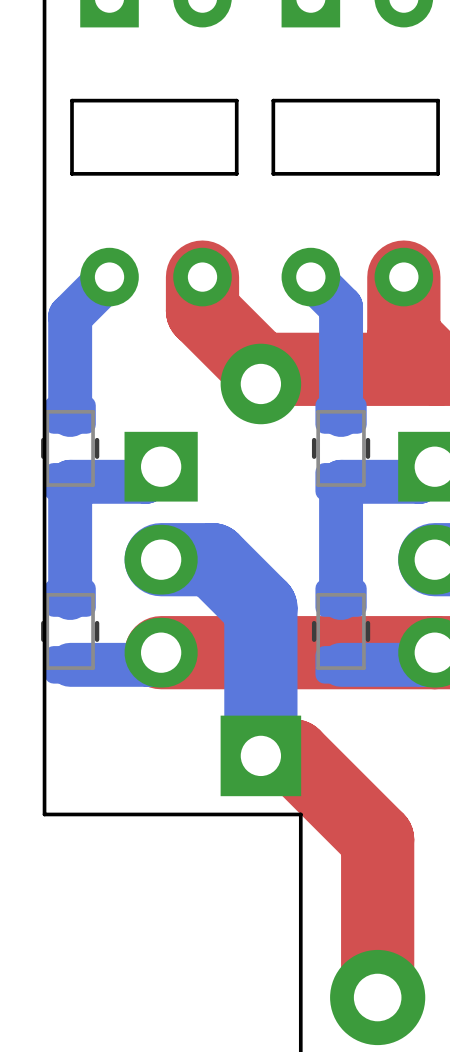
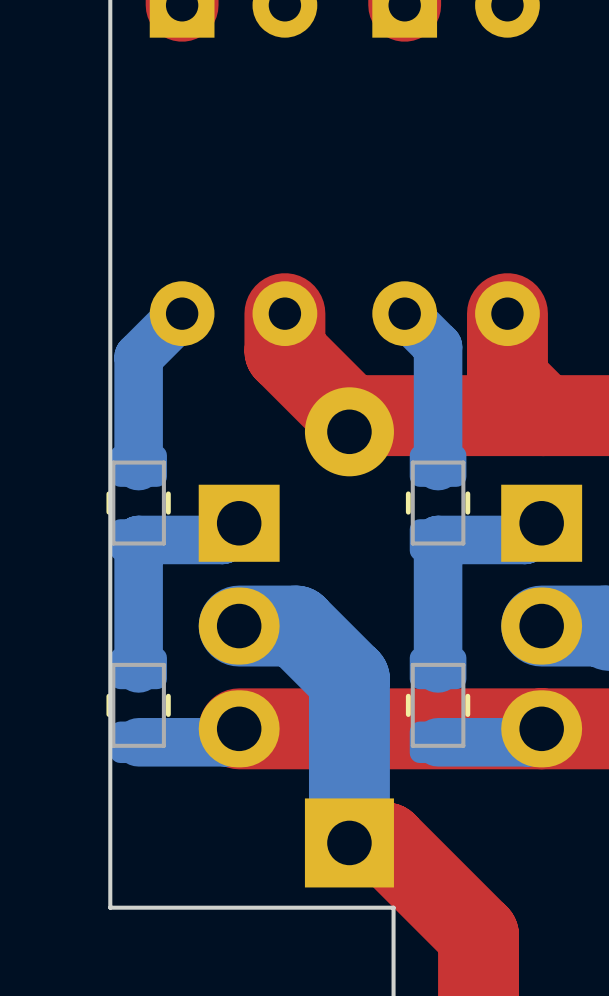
board edge: (236, 100) (71, 100) (71, 173) (236, 173) (236, 100) -> none
board edge: (438, 100) (273, 100) (273, 173) (438, 173) (438, 100) -> none

